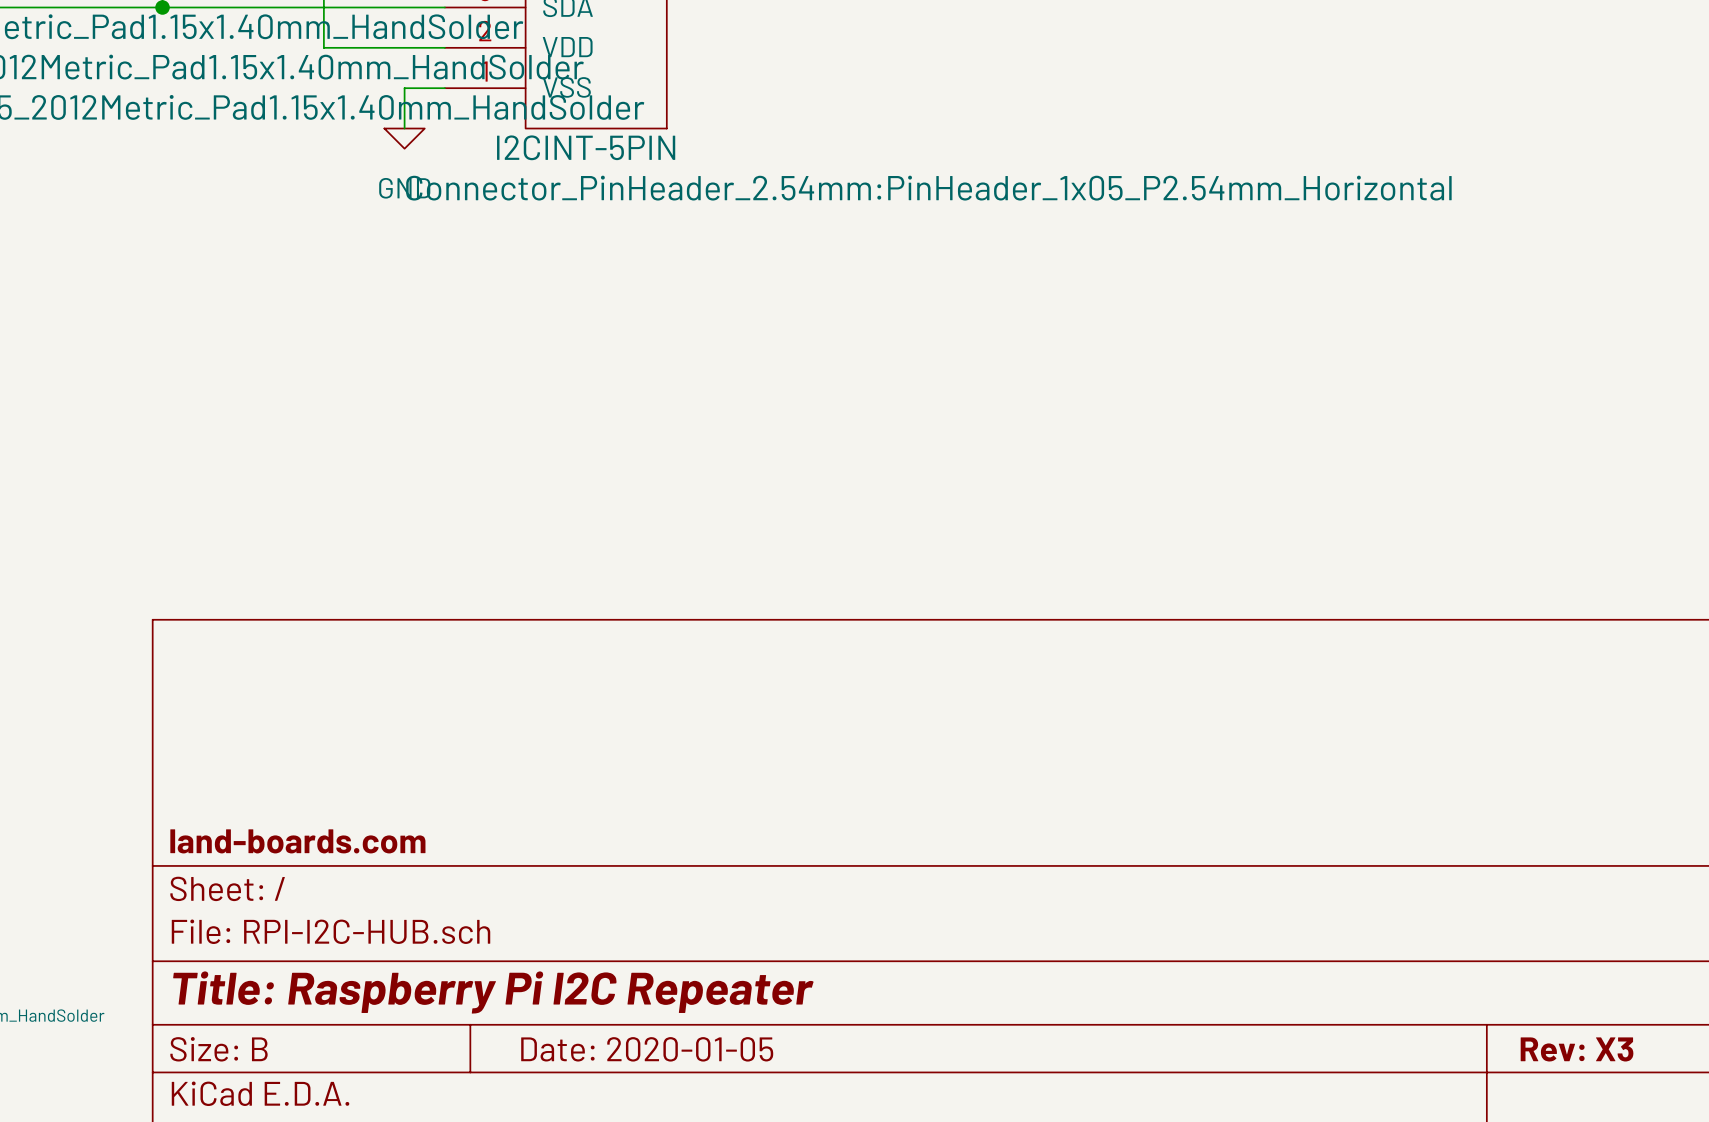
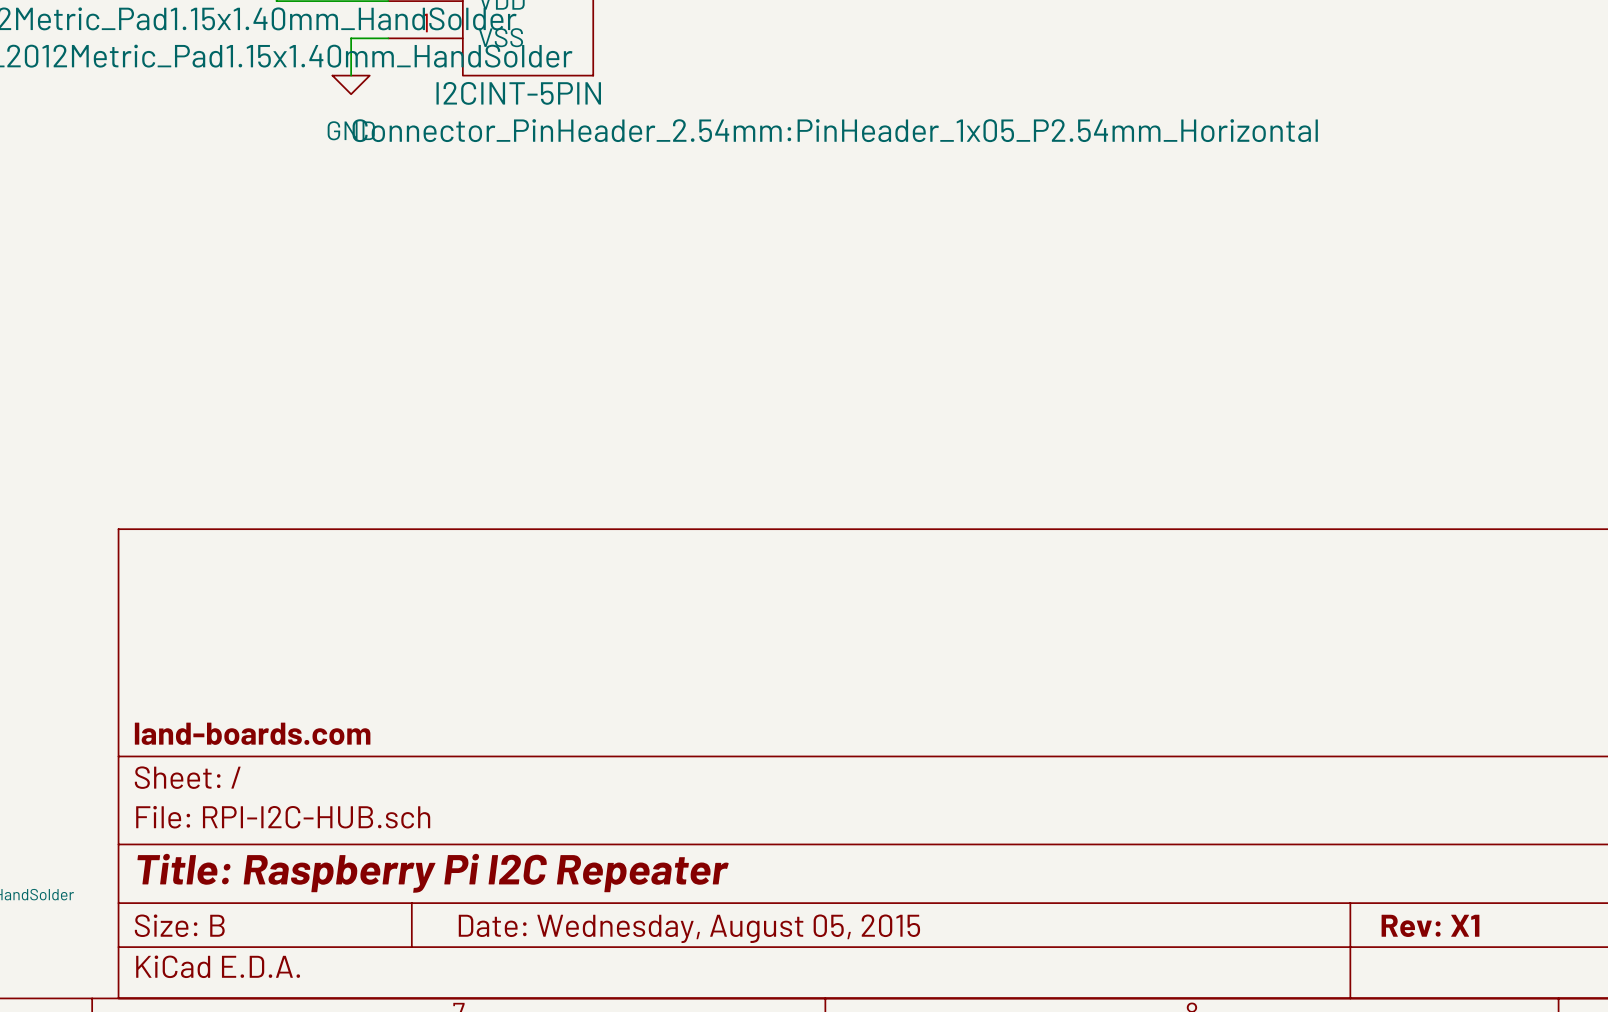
title block: Date: 2020-01-05 (647, 1049) -> Date: Wednesday, August 05, 2015 (689, 928)
title block: Rev: X3 (1577, 1049) -> Rev: X1 (1430, 925)

